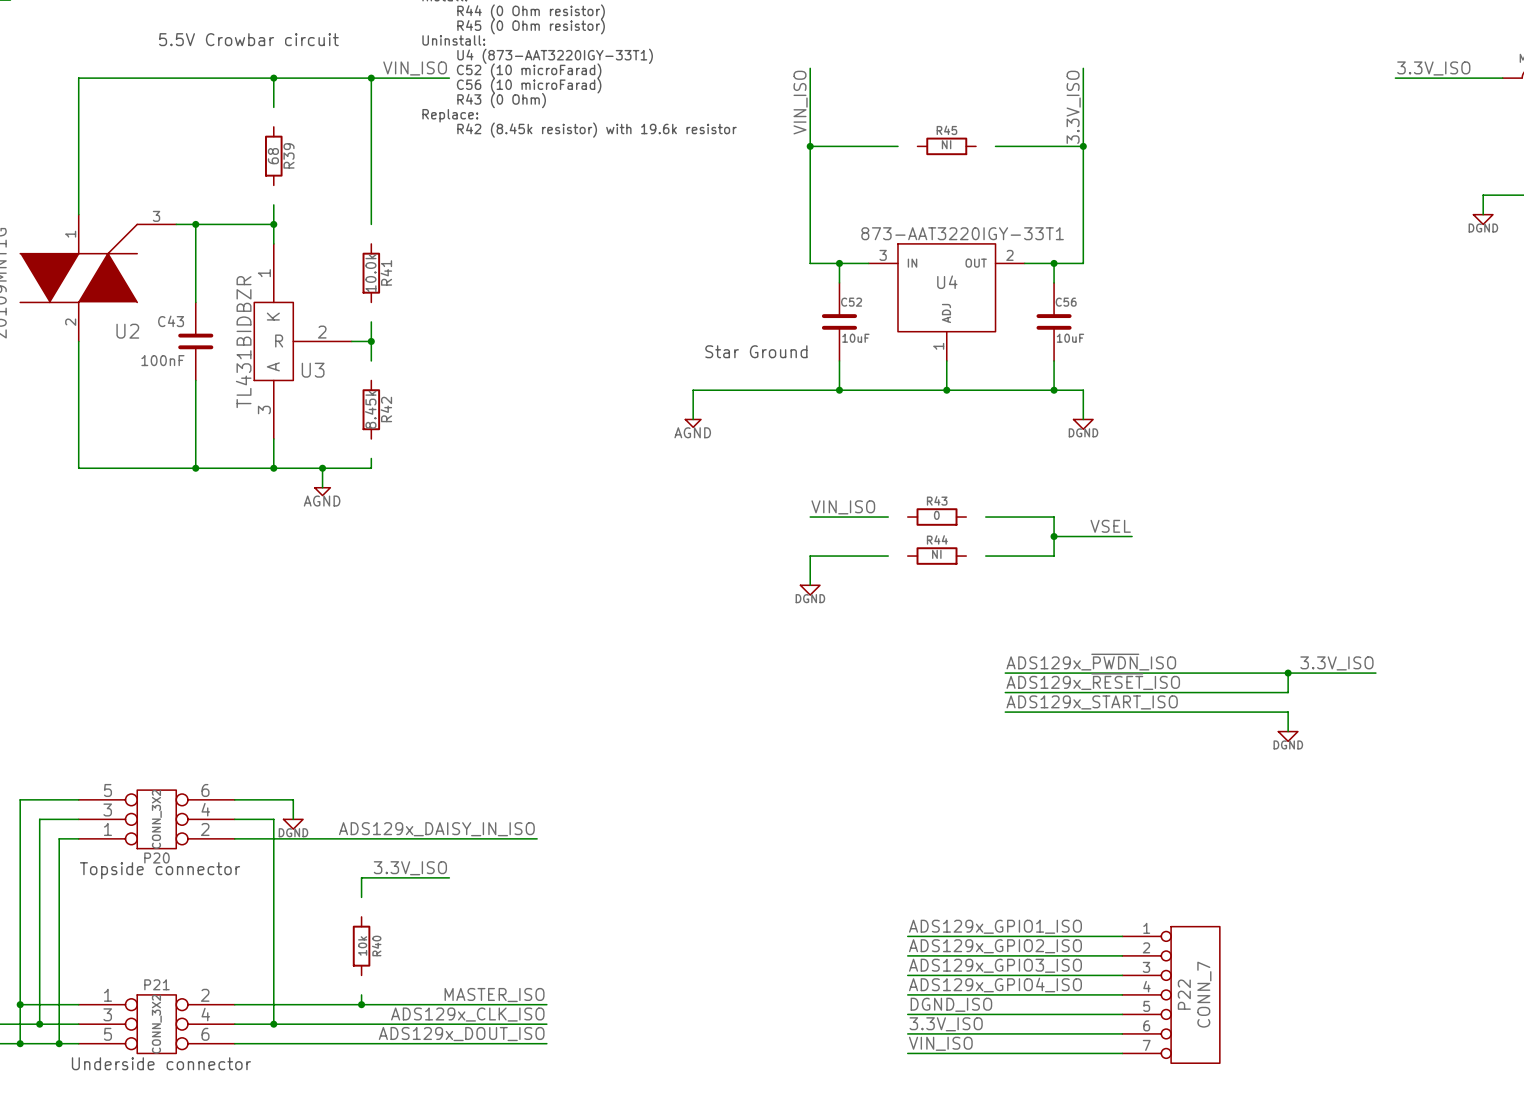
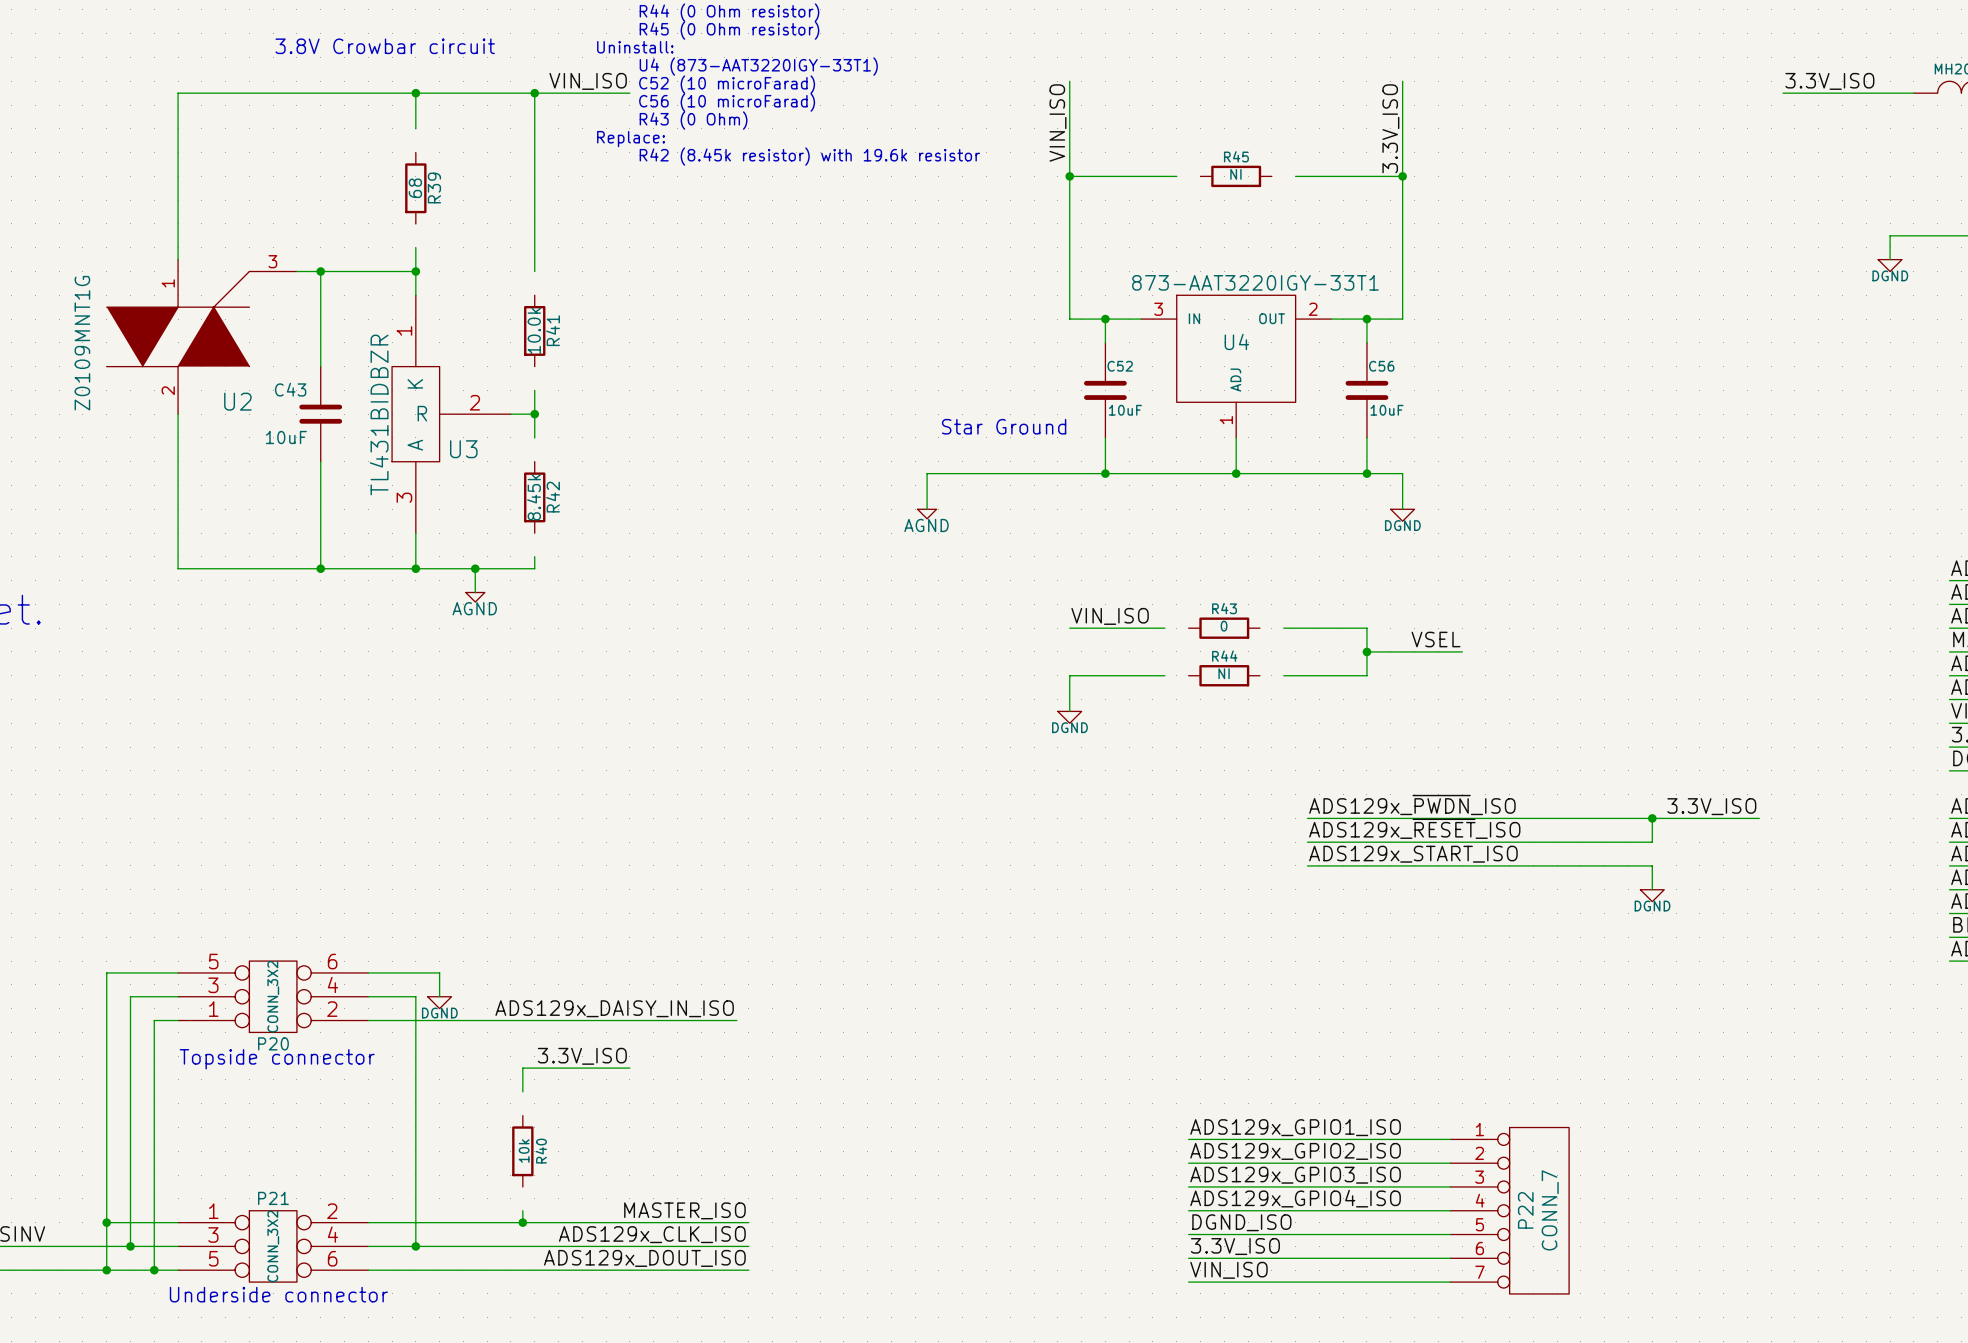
text: 5.5V Crowbar circuit (248, 39) -> 3.8V Crowbar circuit (385, 46)
C43 value: 100nF (162, 360) -> 10uF (286, 437)

